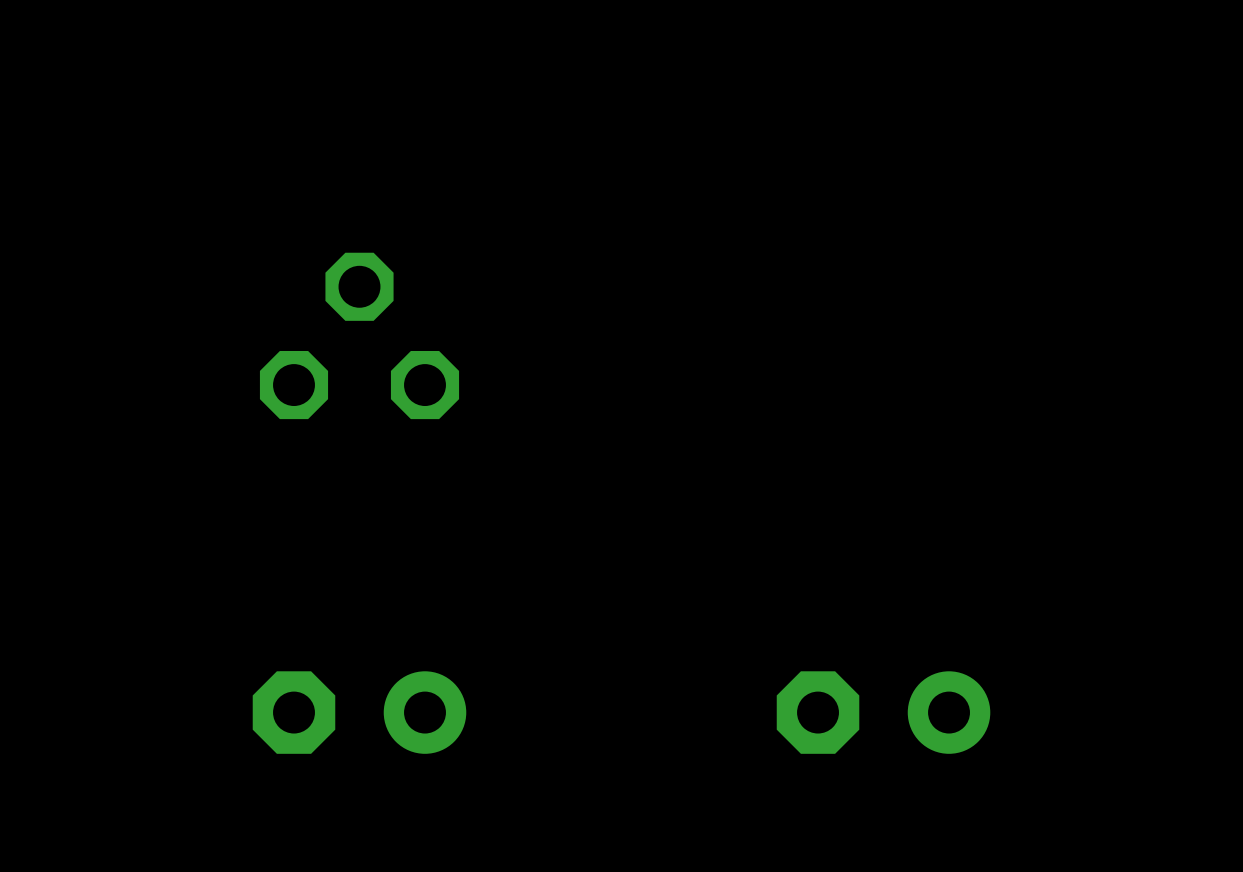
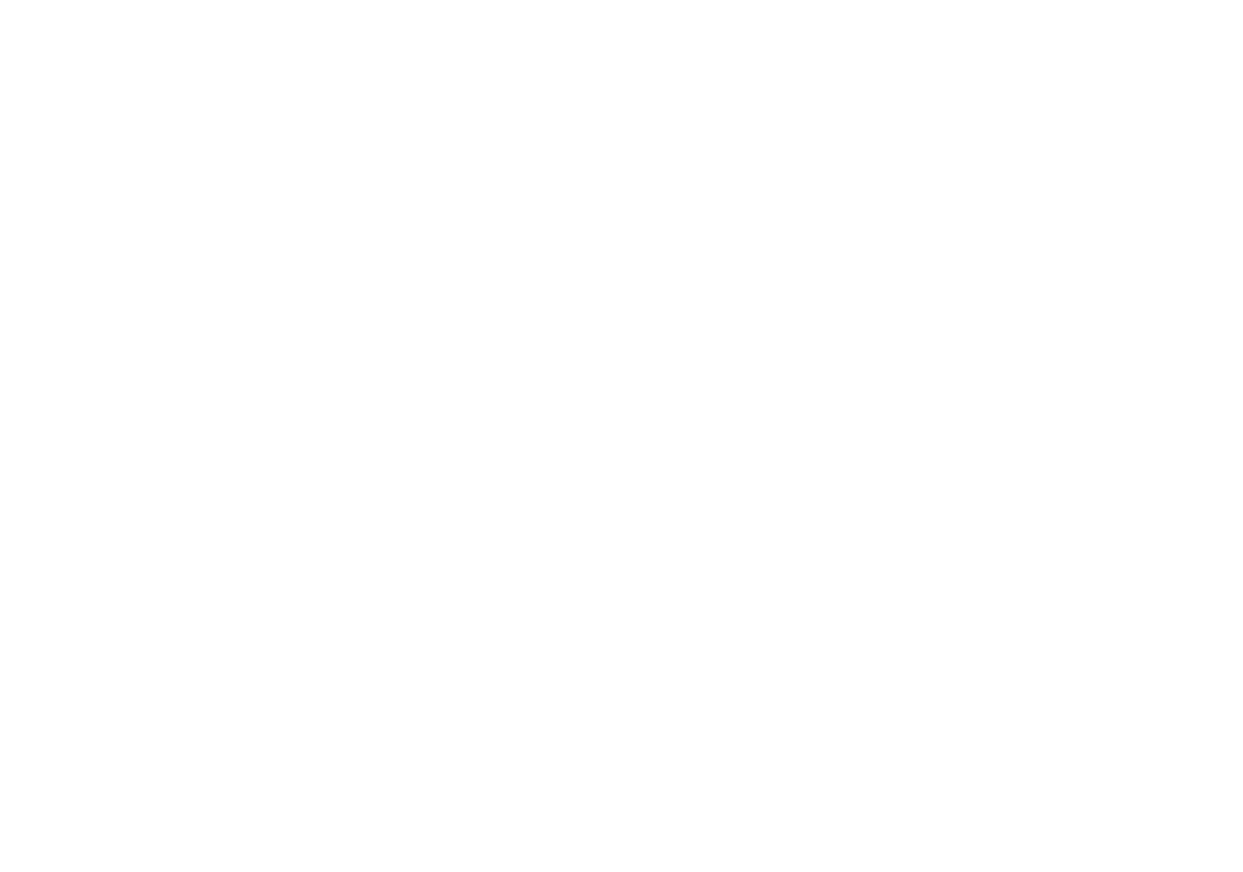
part: (359, 335) -> none
part: (359, 712) -> none
part: (883, 712) -> none

